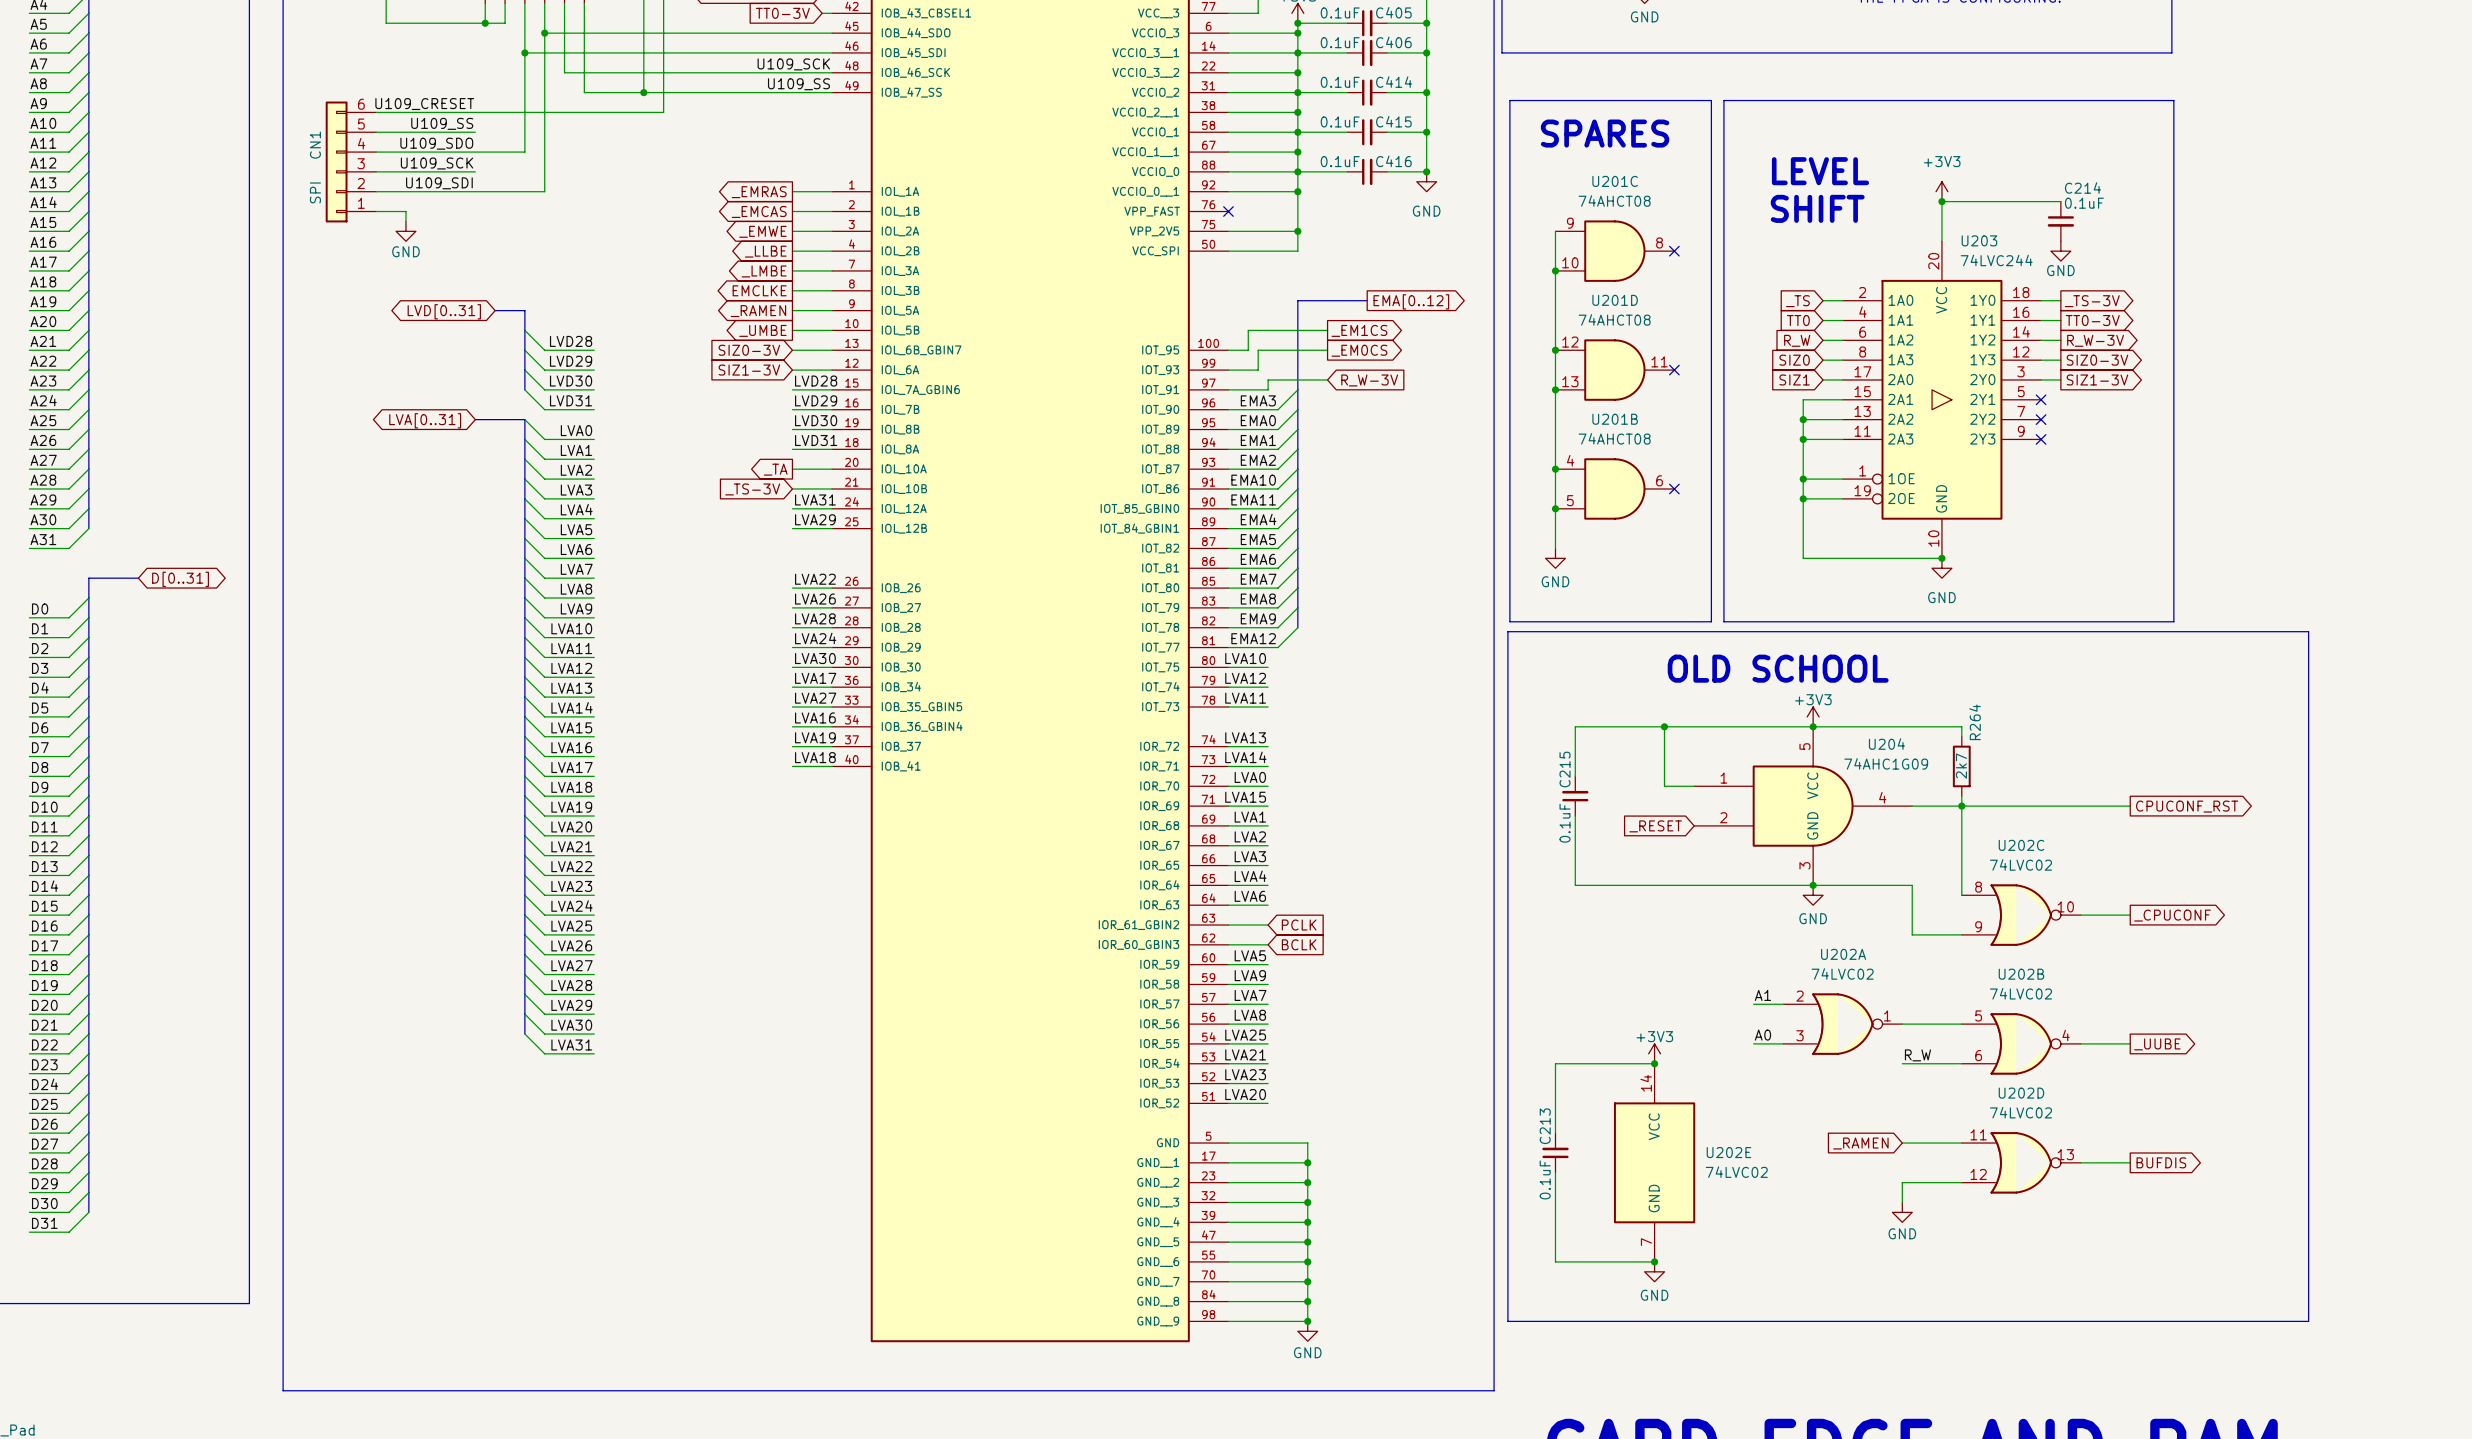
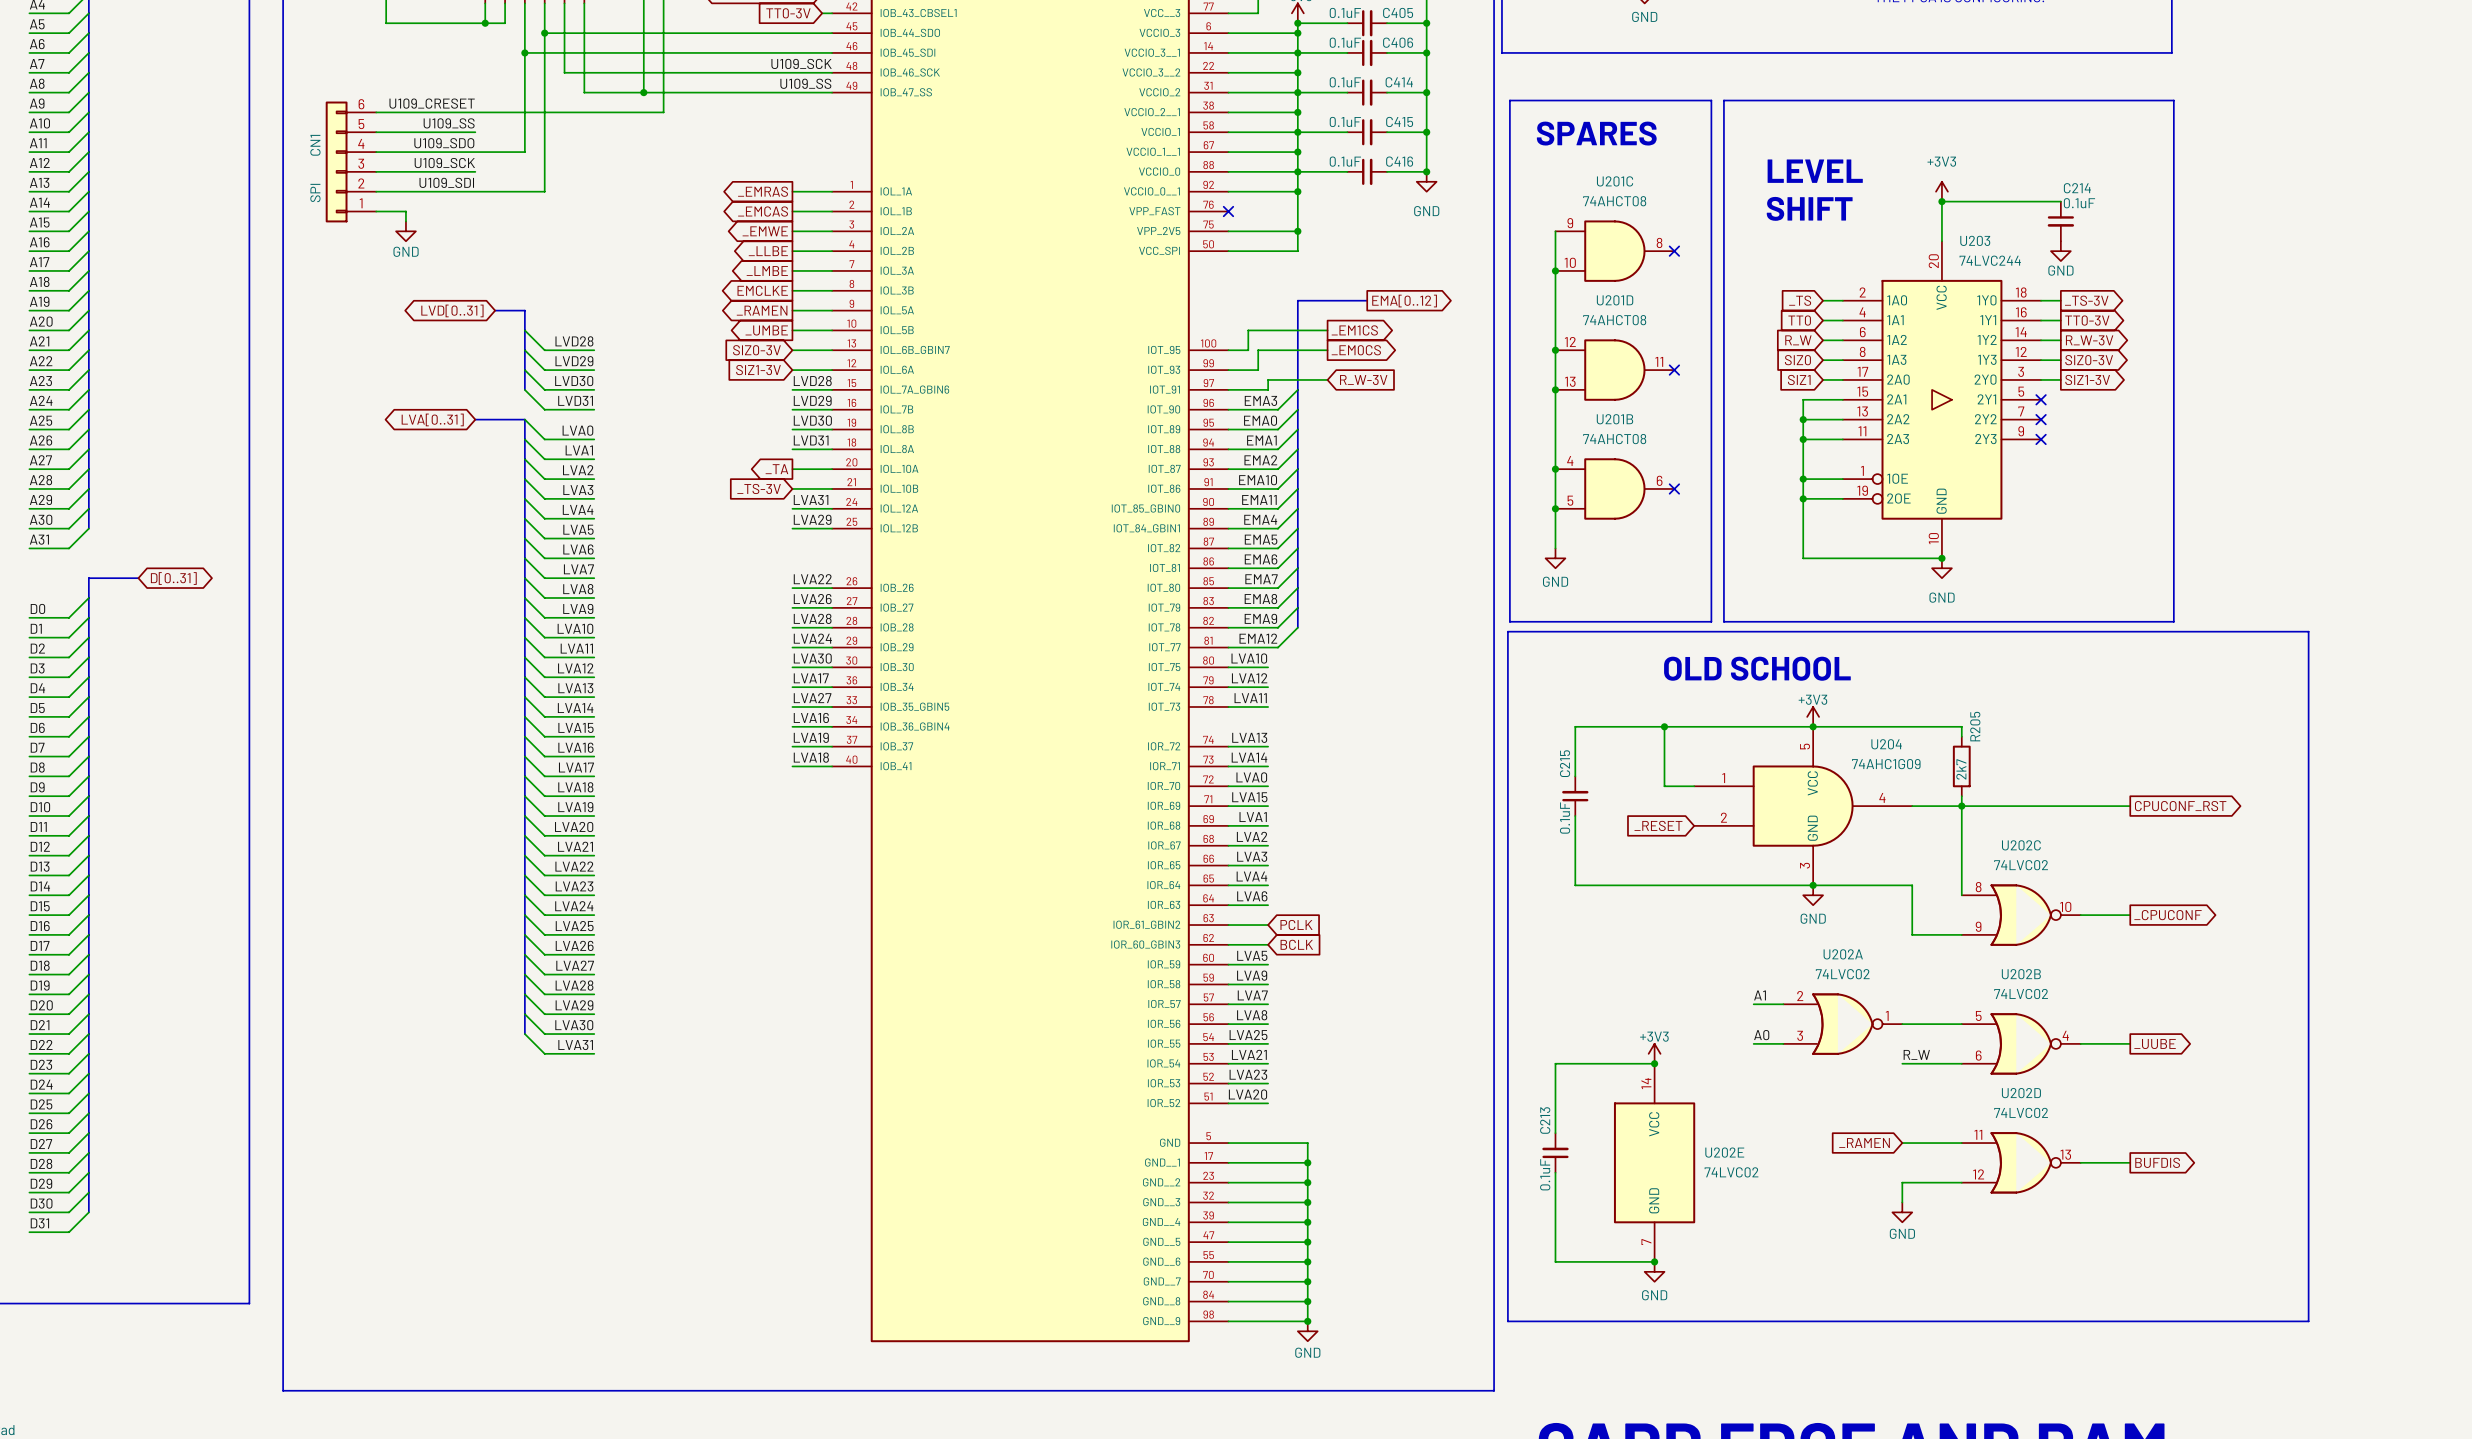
R264 name: R264 (1975, 722) -> R205 (1975, 726)

